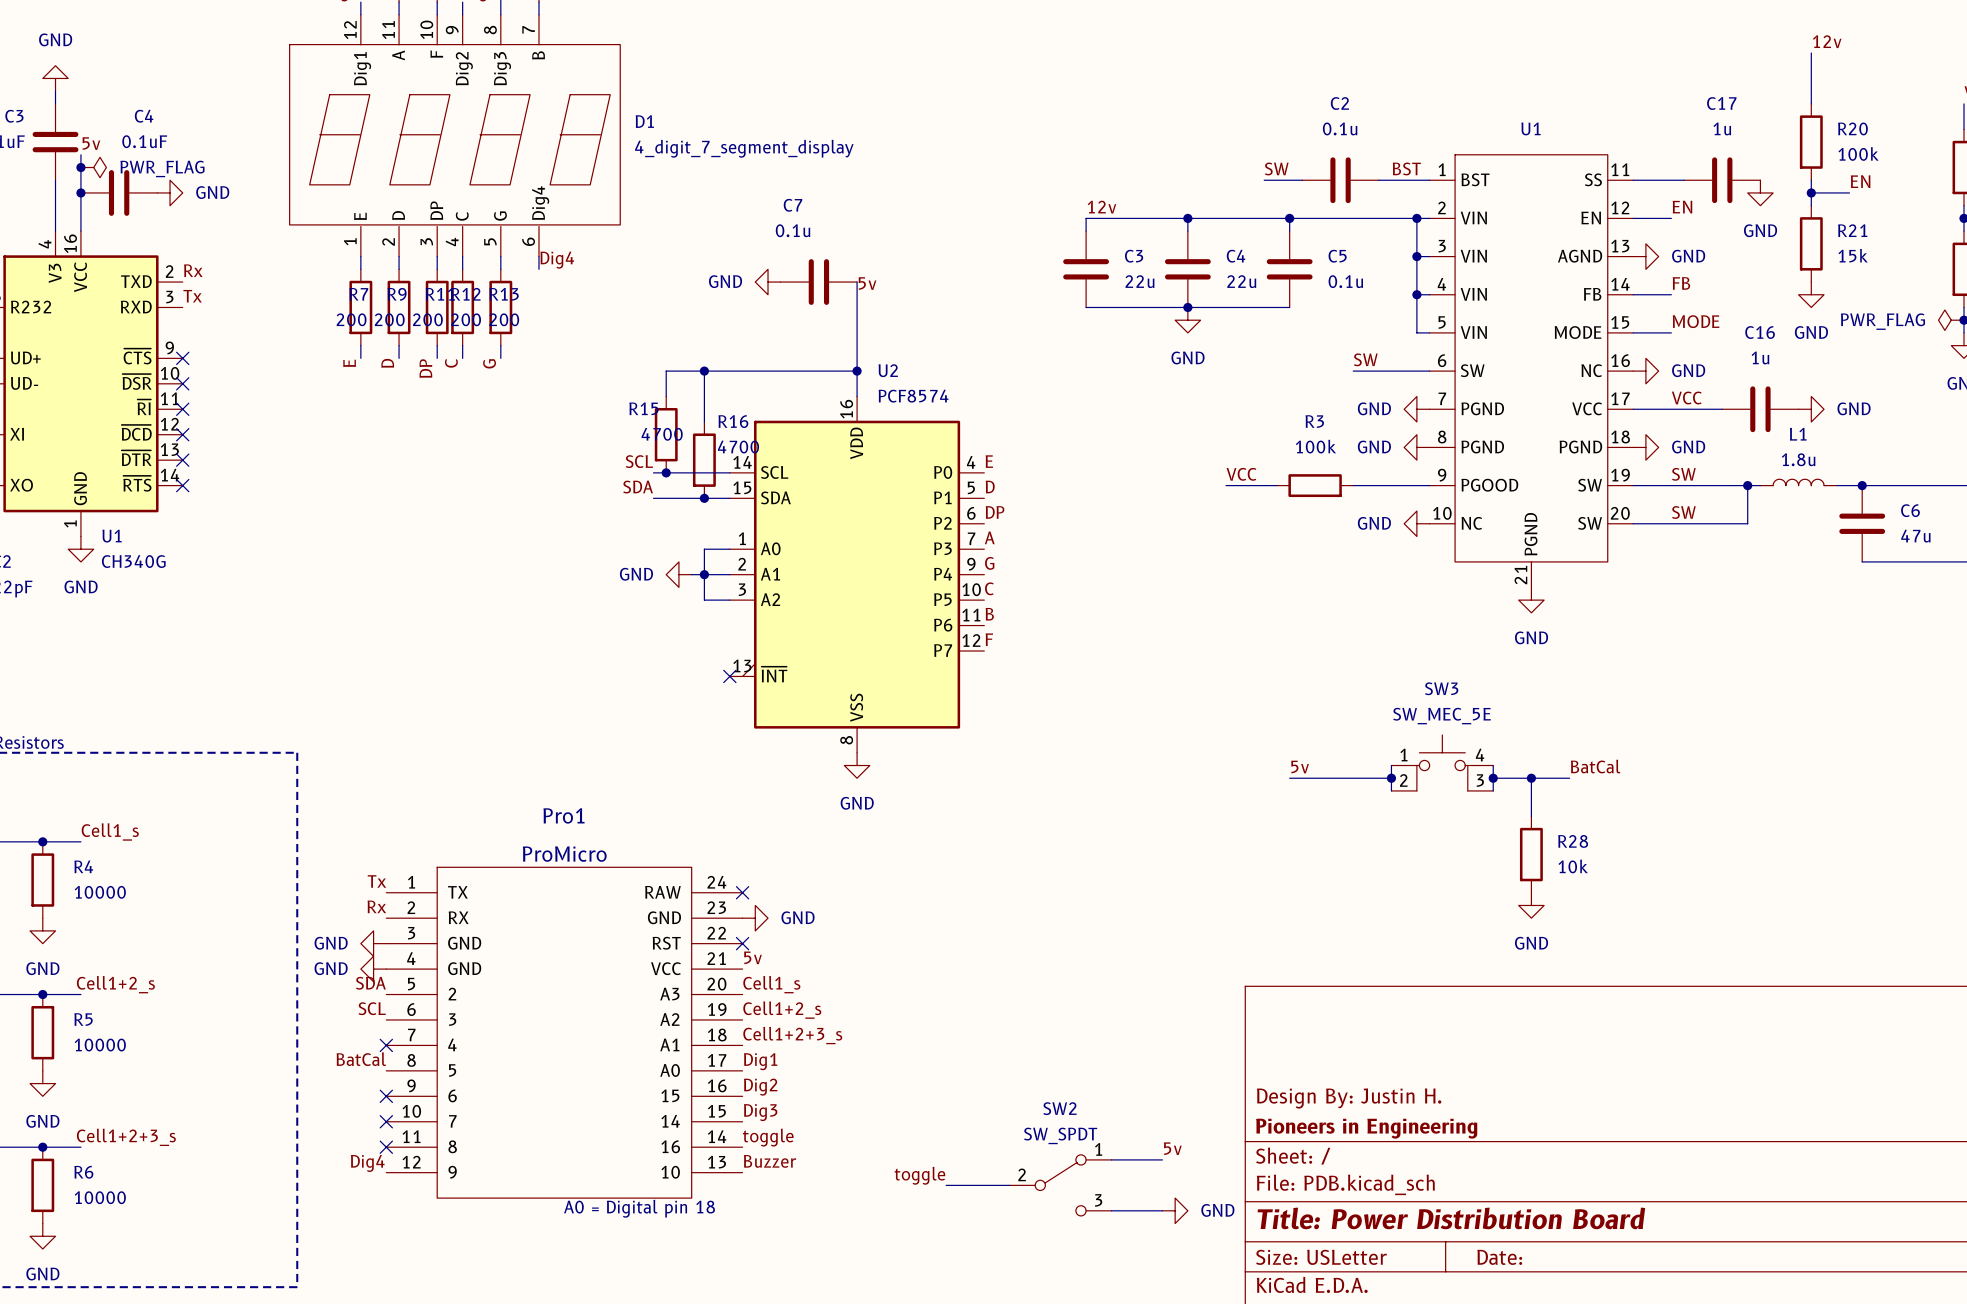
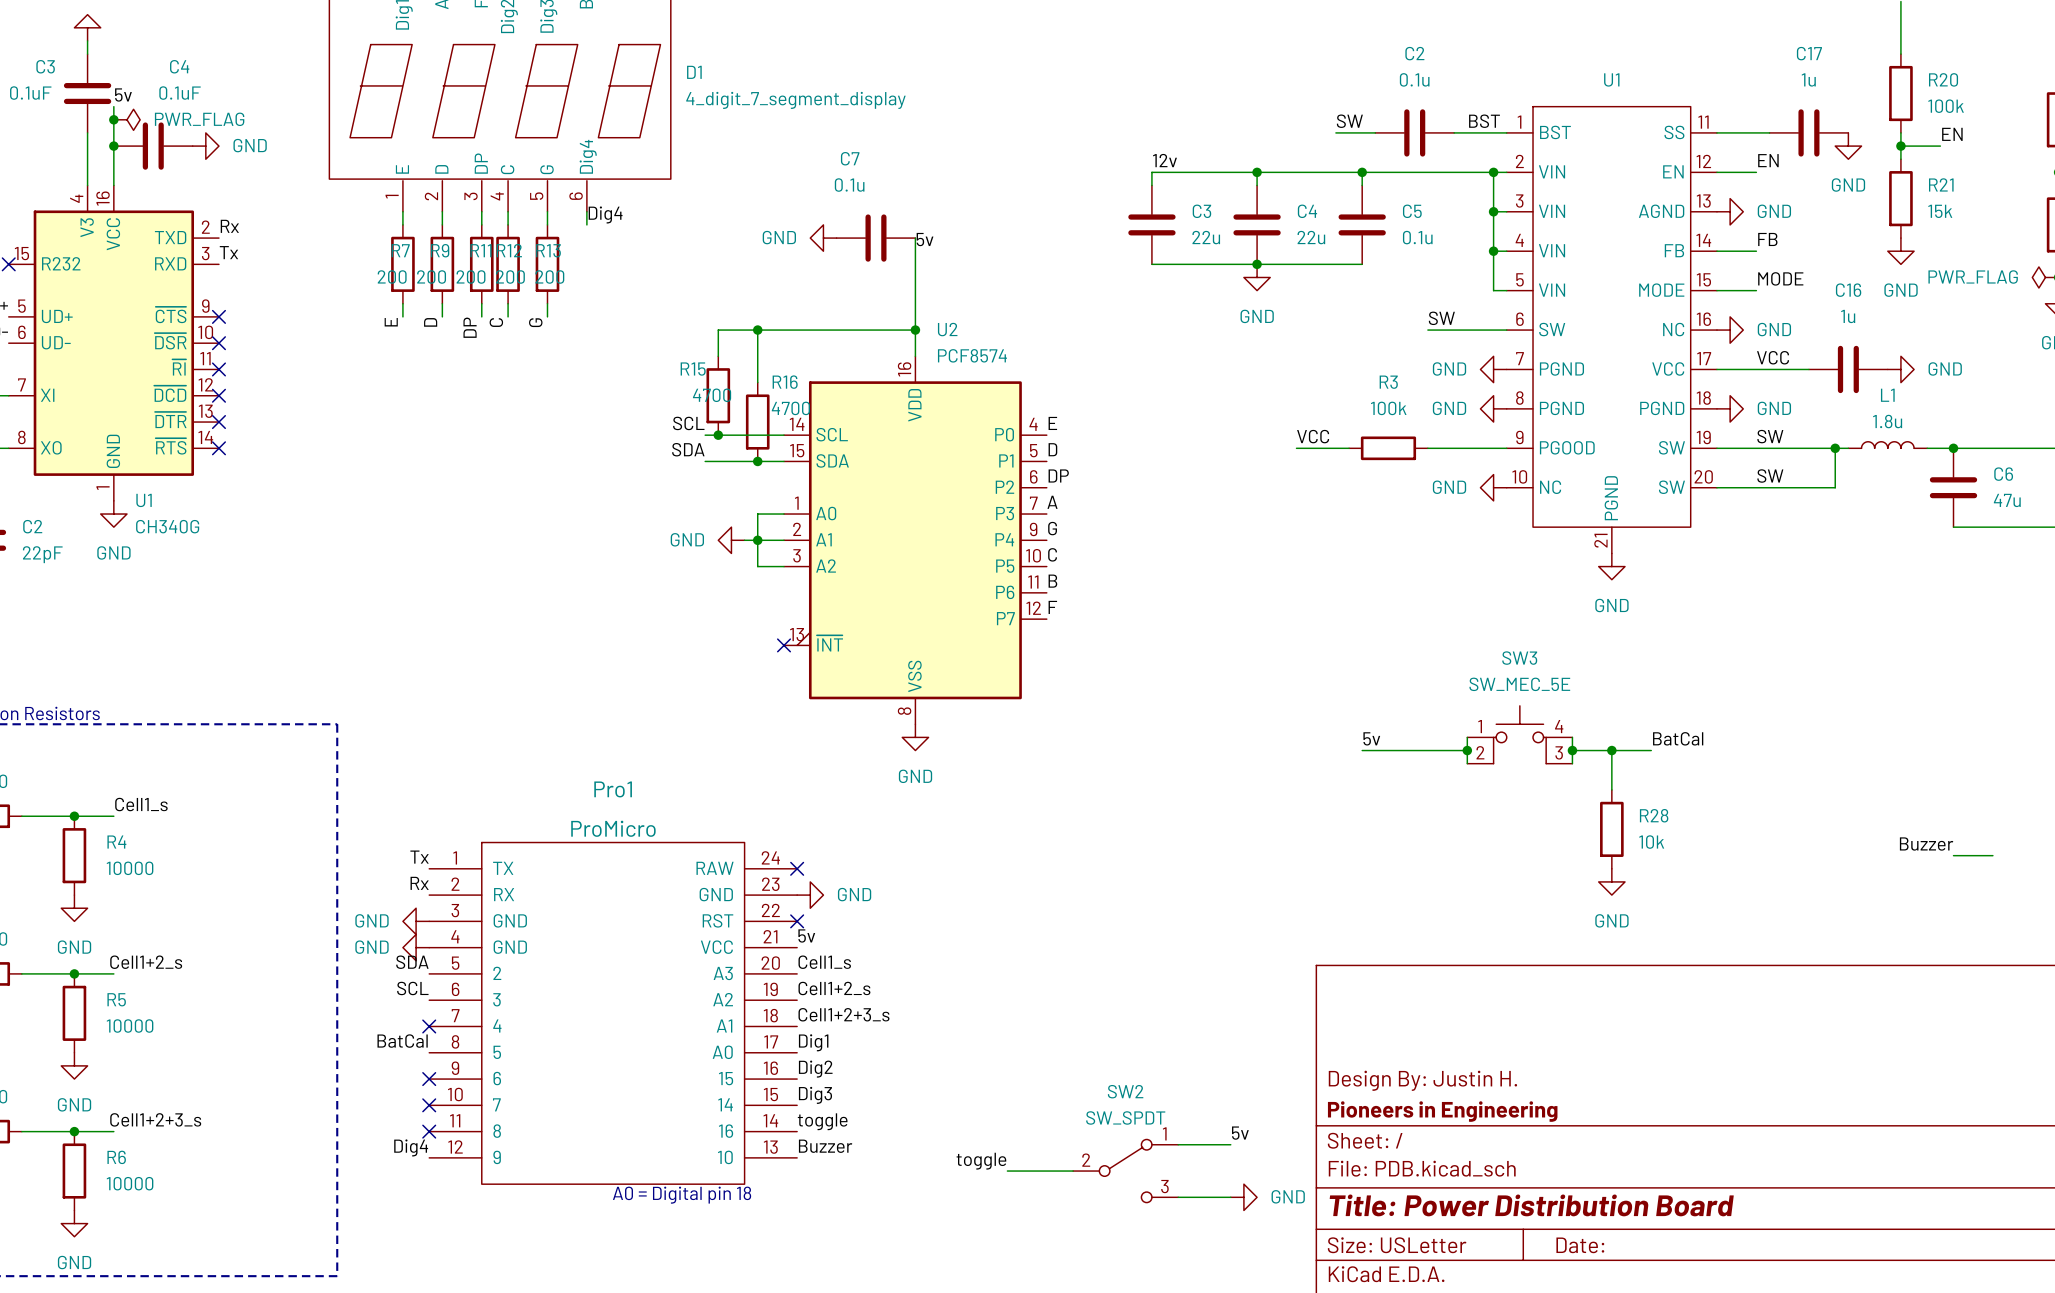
label: none -> Buzzer (1926, 844)
wire: none -> (1953, 855) (1992, 855)

